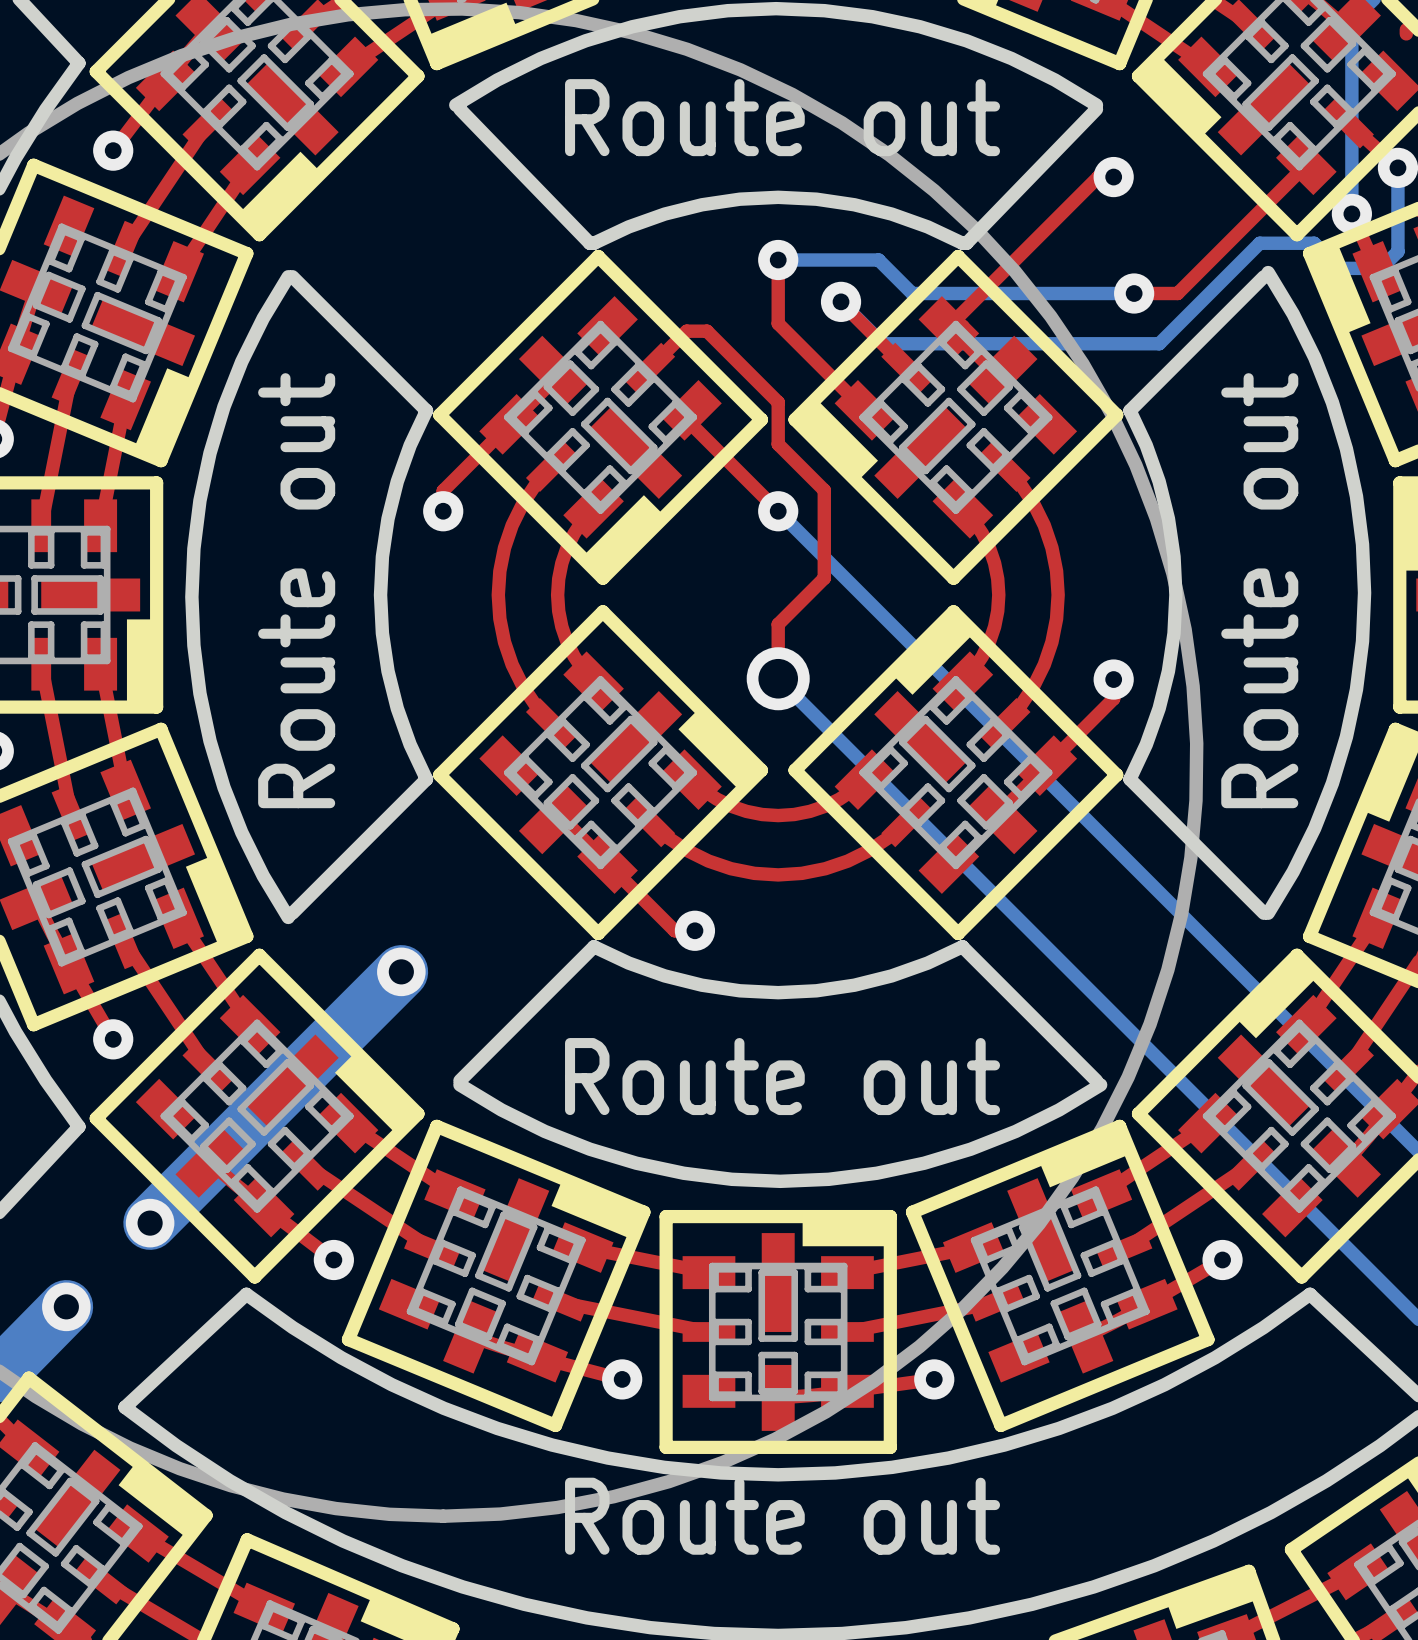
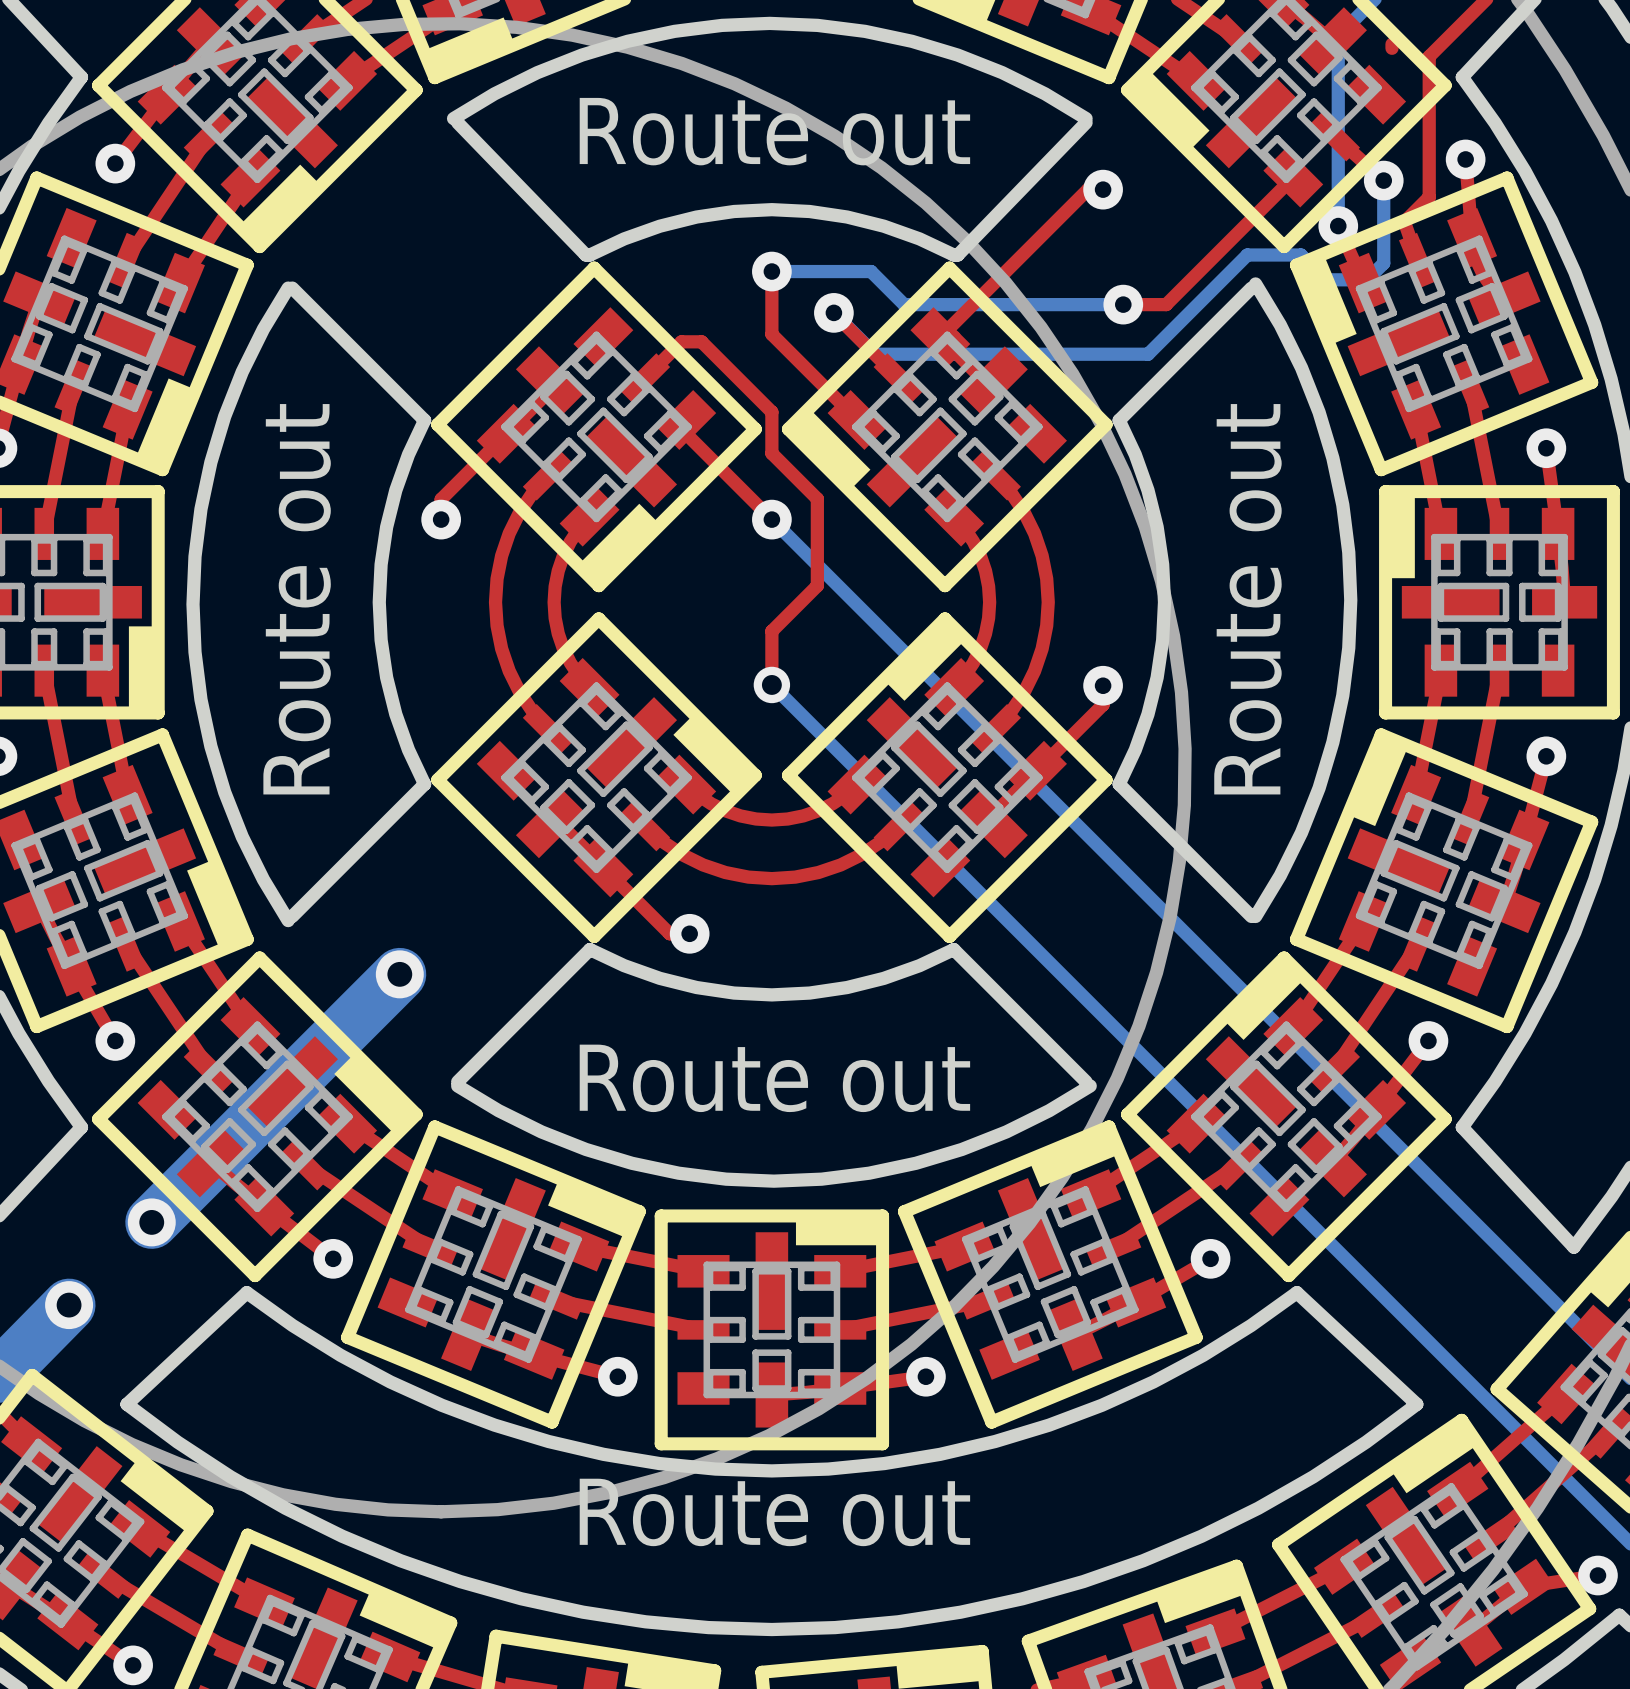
via size: [746, 647, 810, 711] -> [753, 666, 791, 704]

